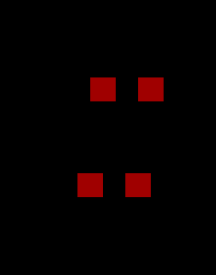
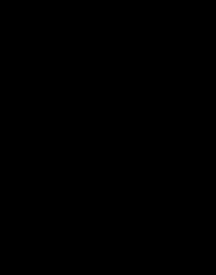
part: (126, 89) -> none
part: (114, 185) -> none

